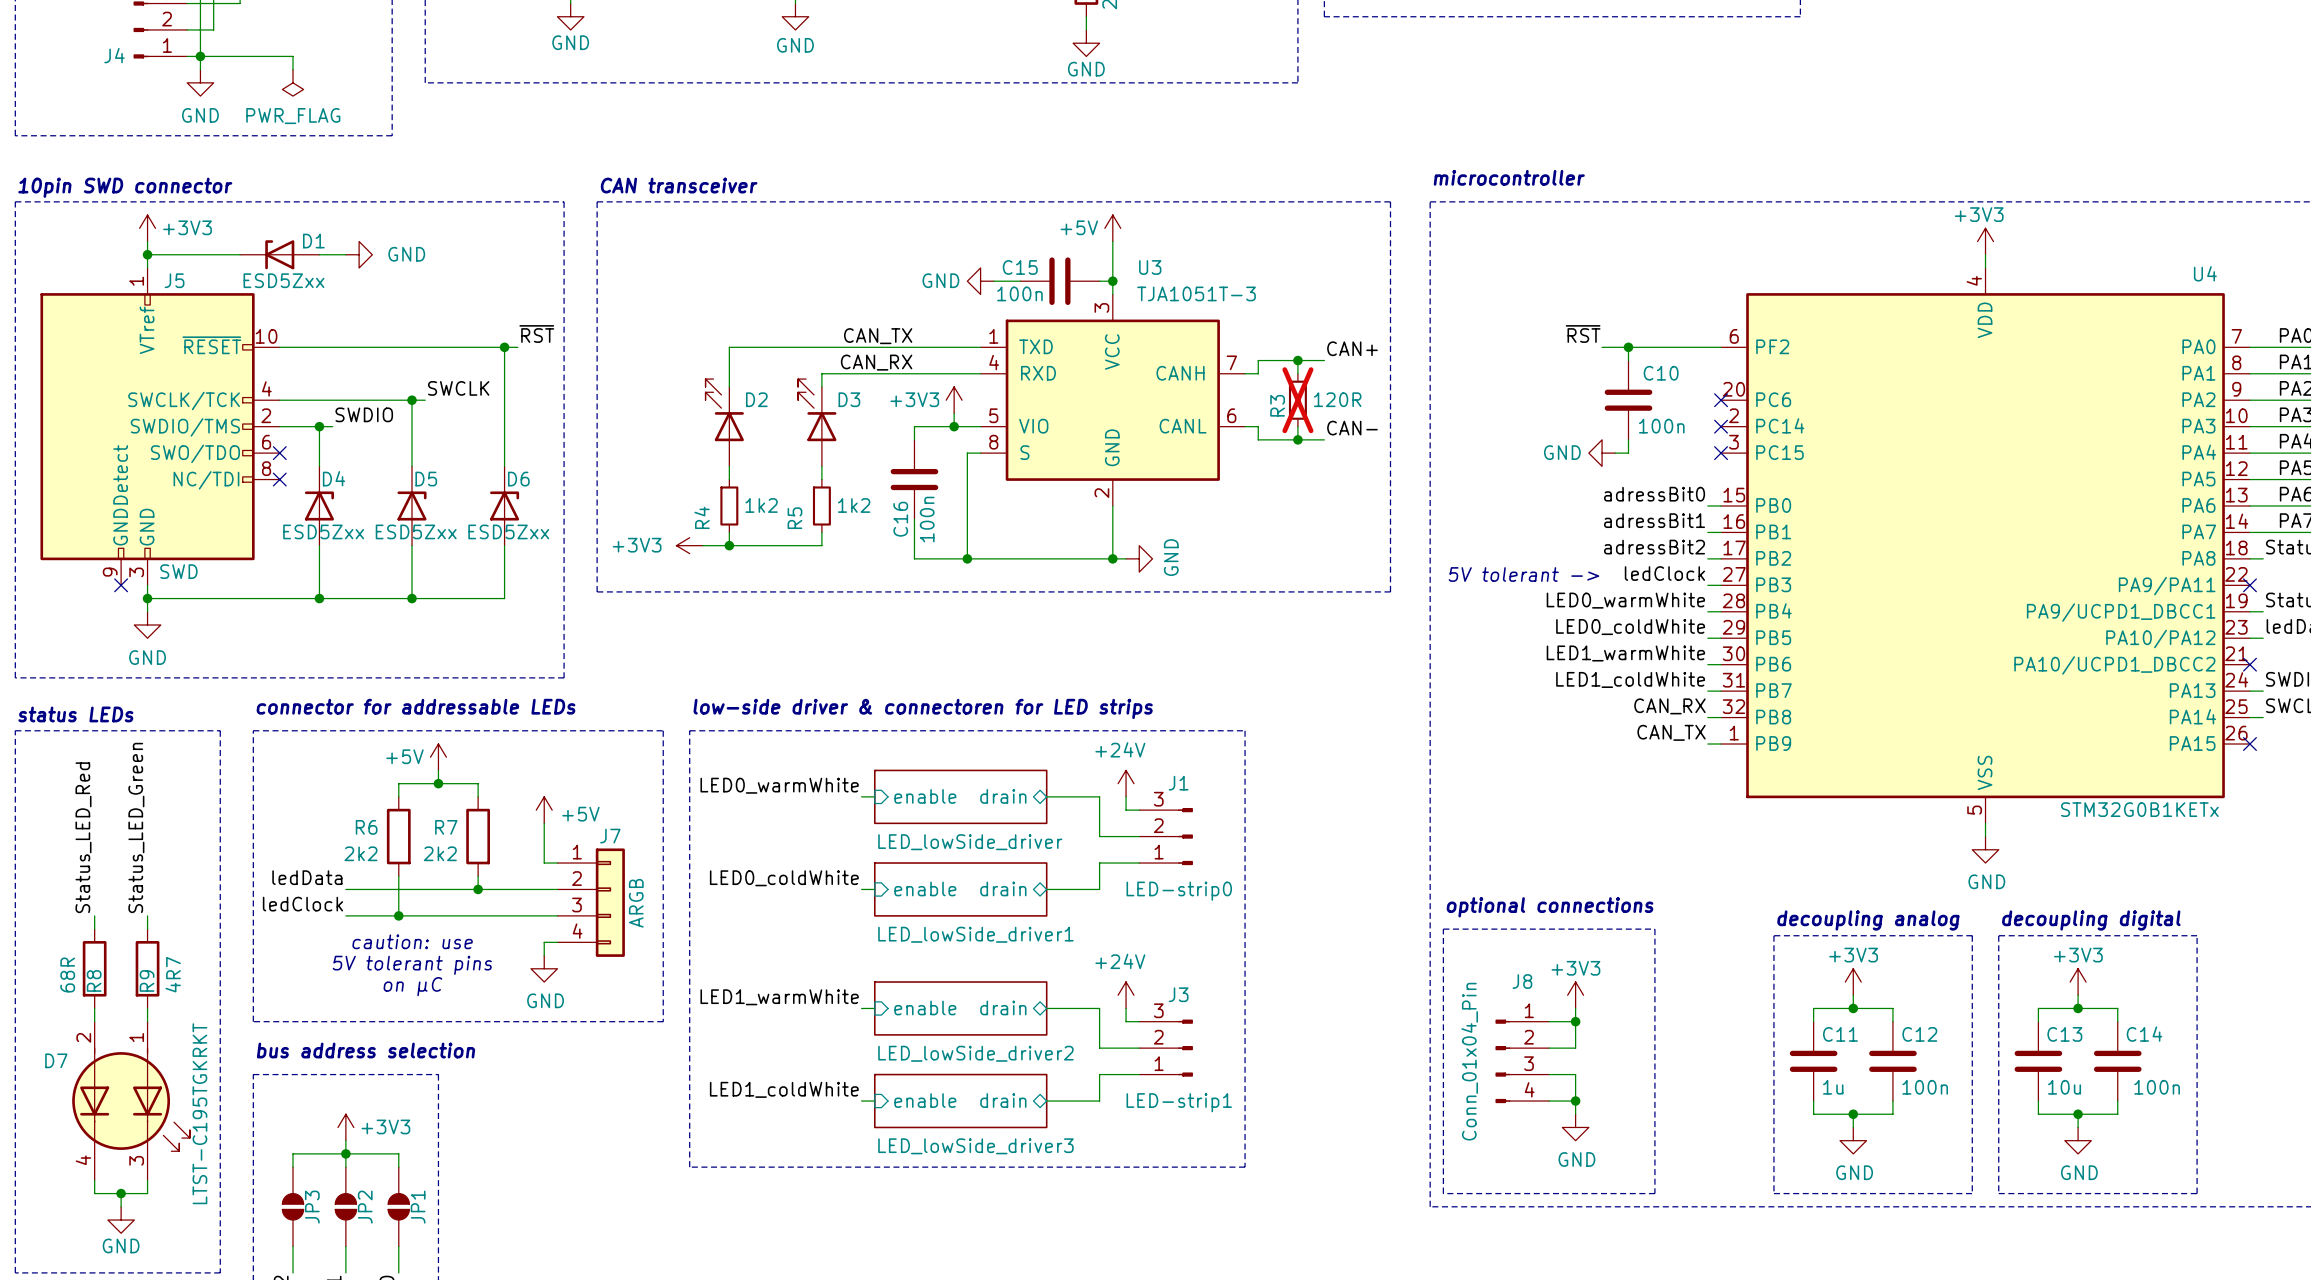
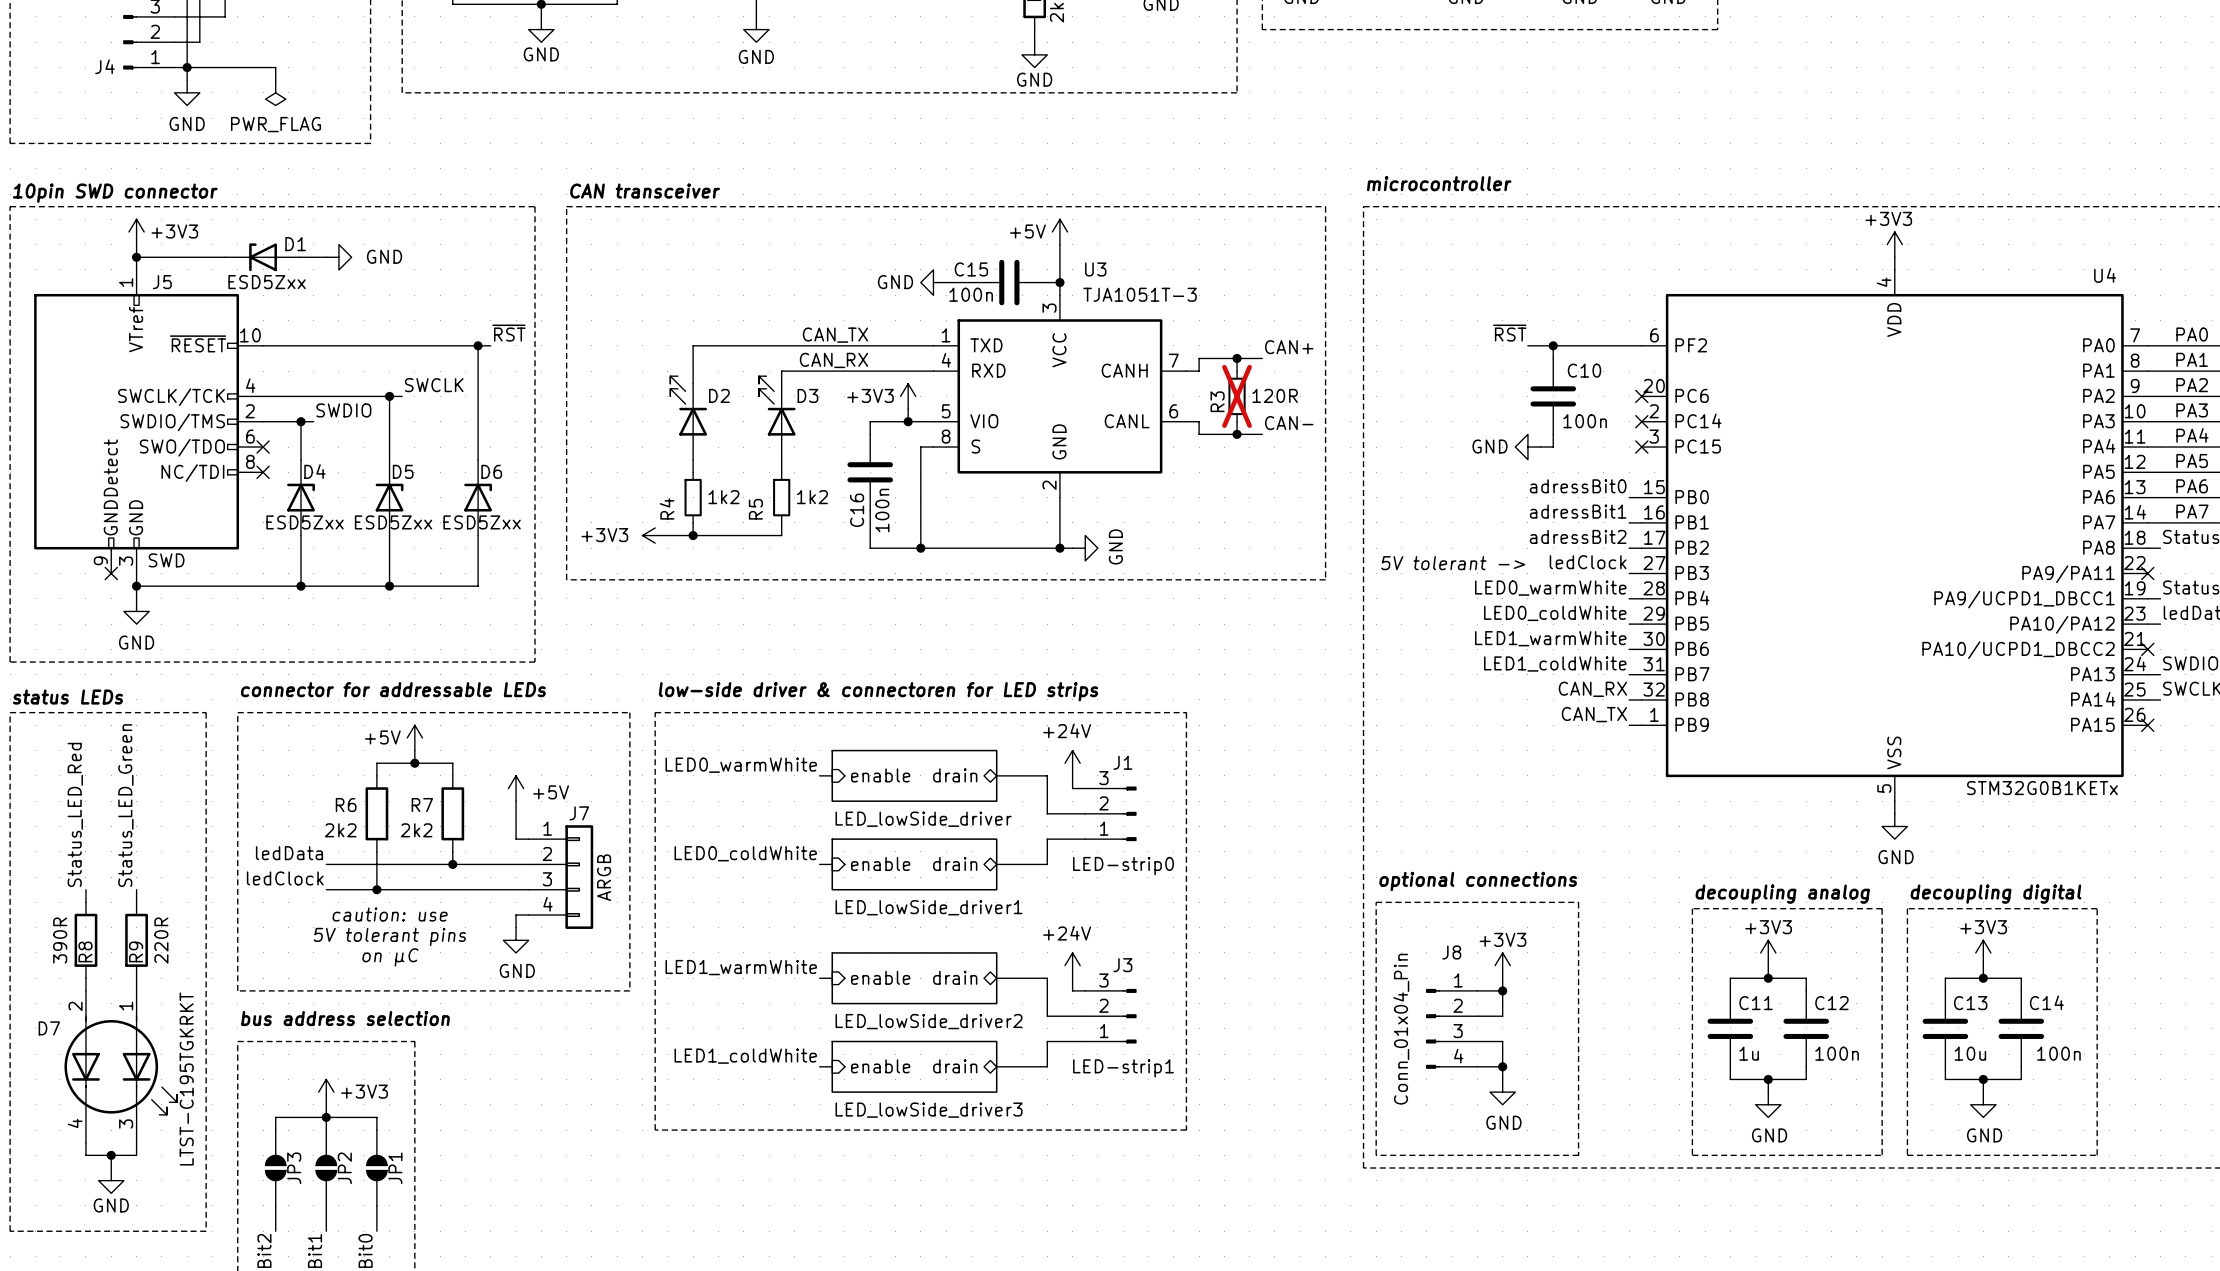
R8 value: 68R (67, 974) -> 390R (60, 940)
R9 value: 4R7 (173, 974) -> 220R (161, 940)

